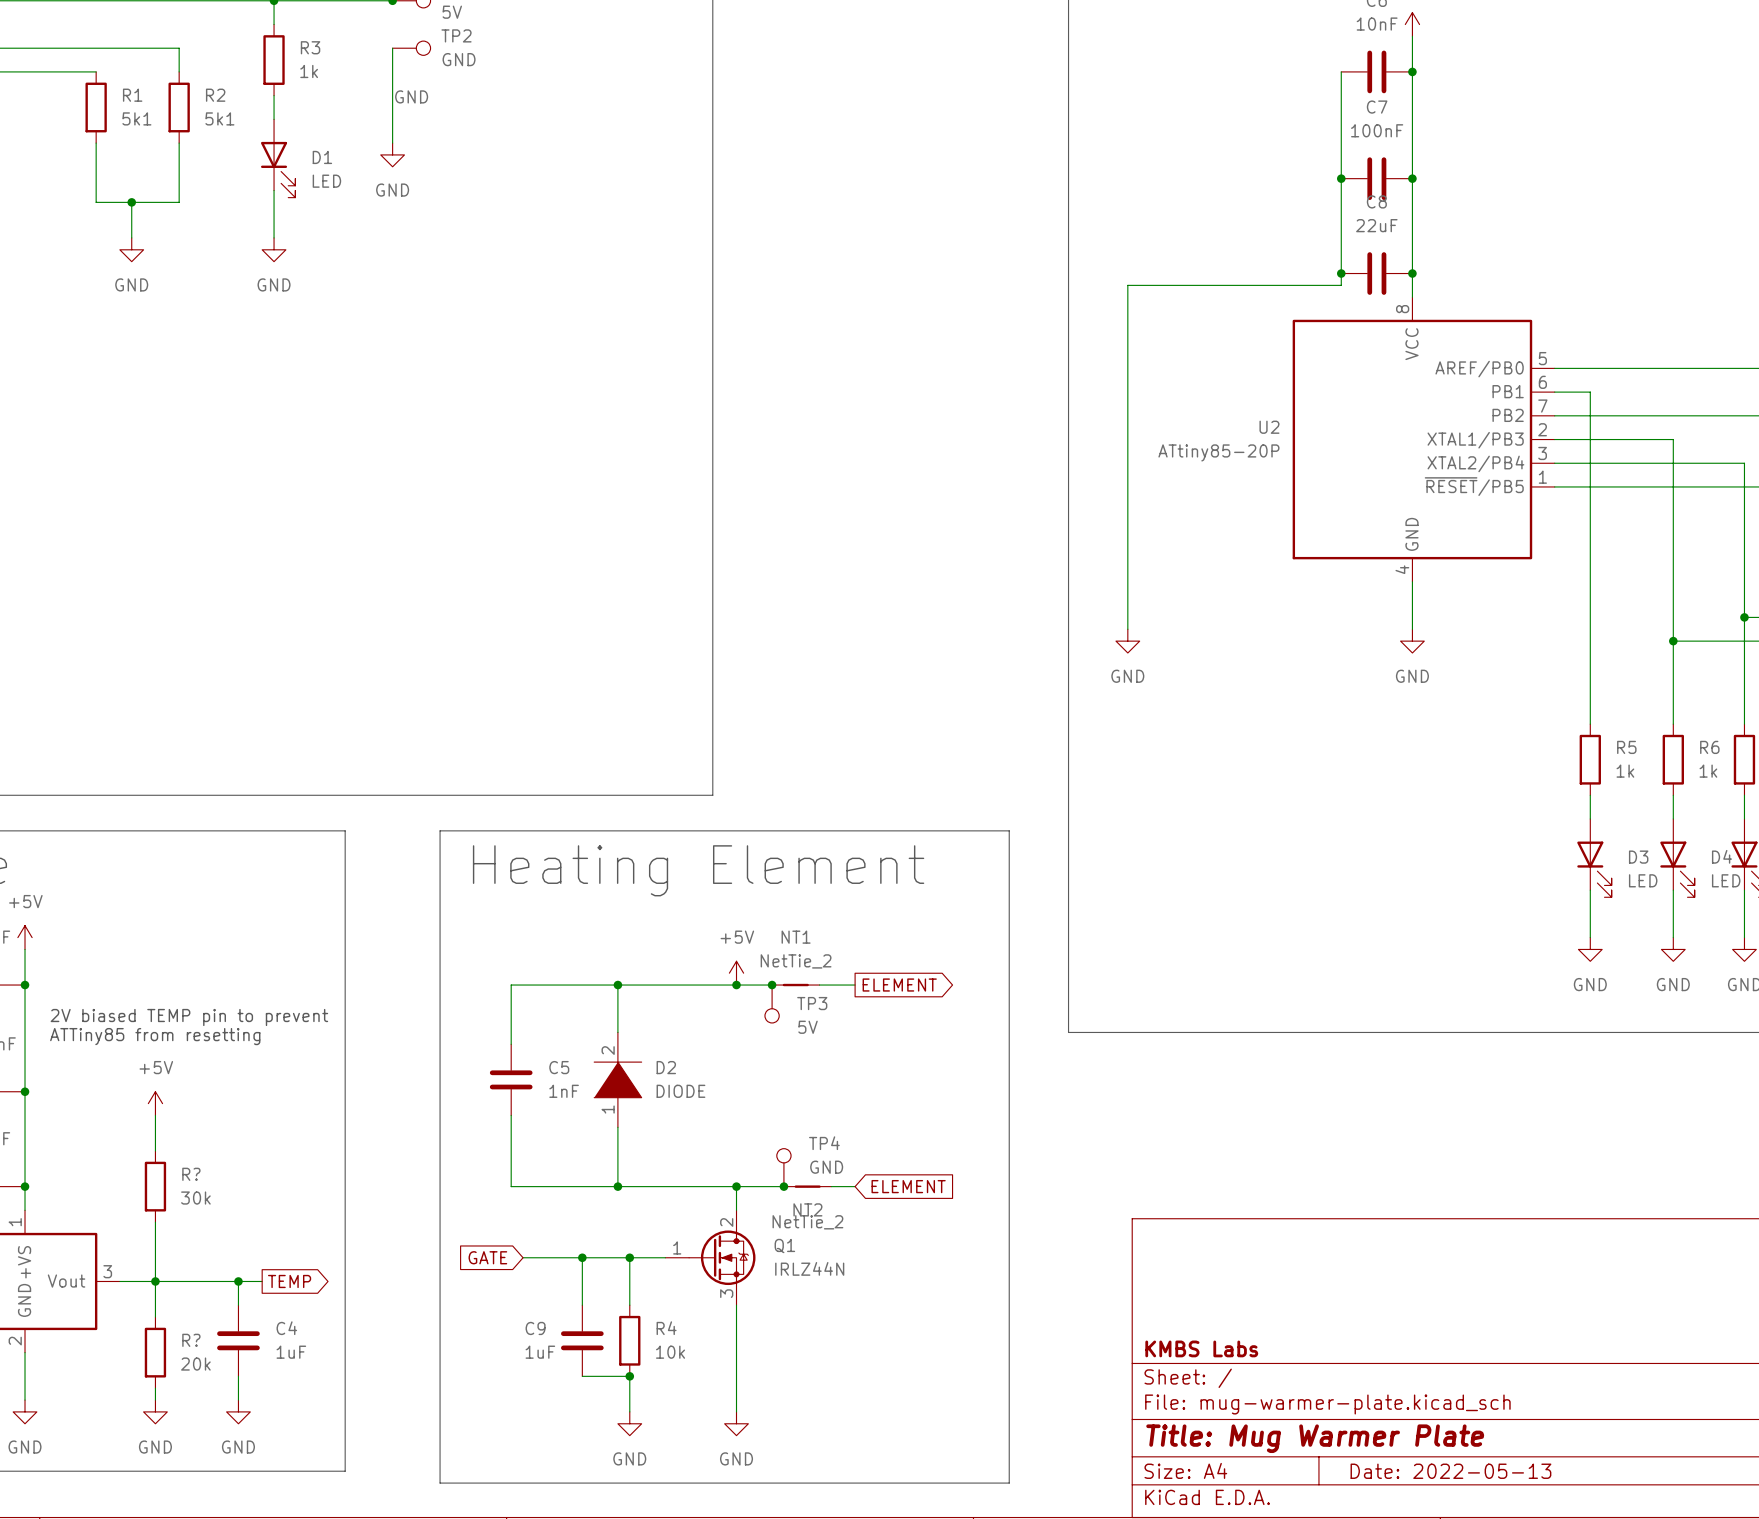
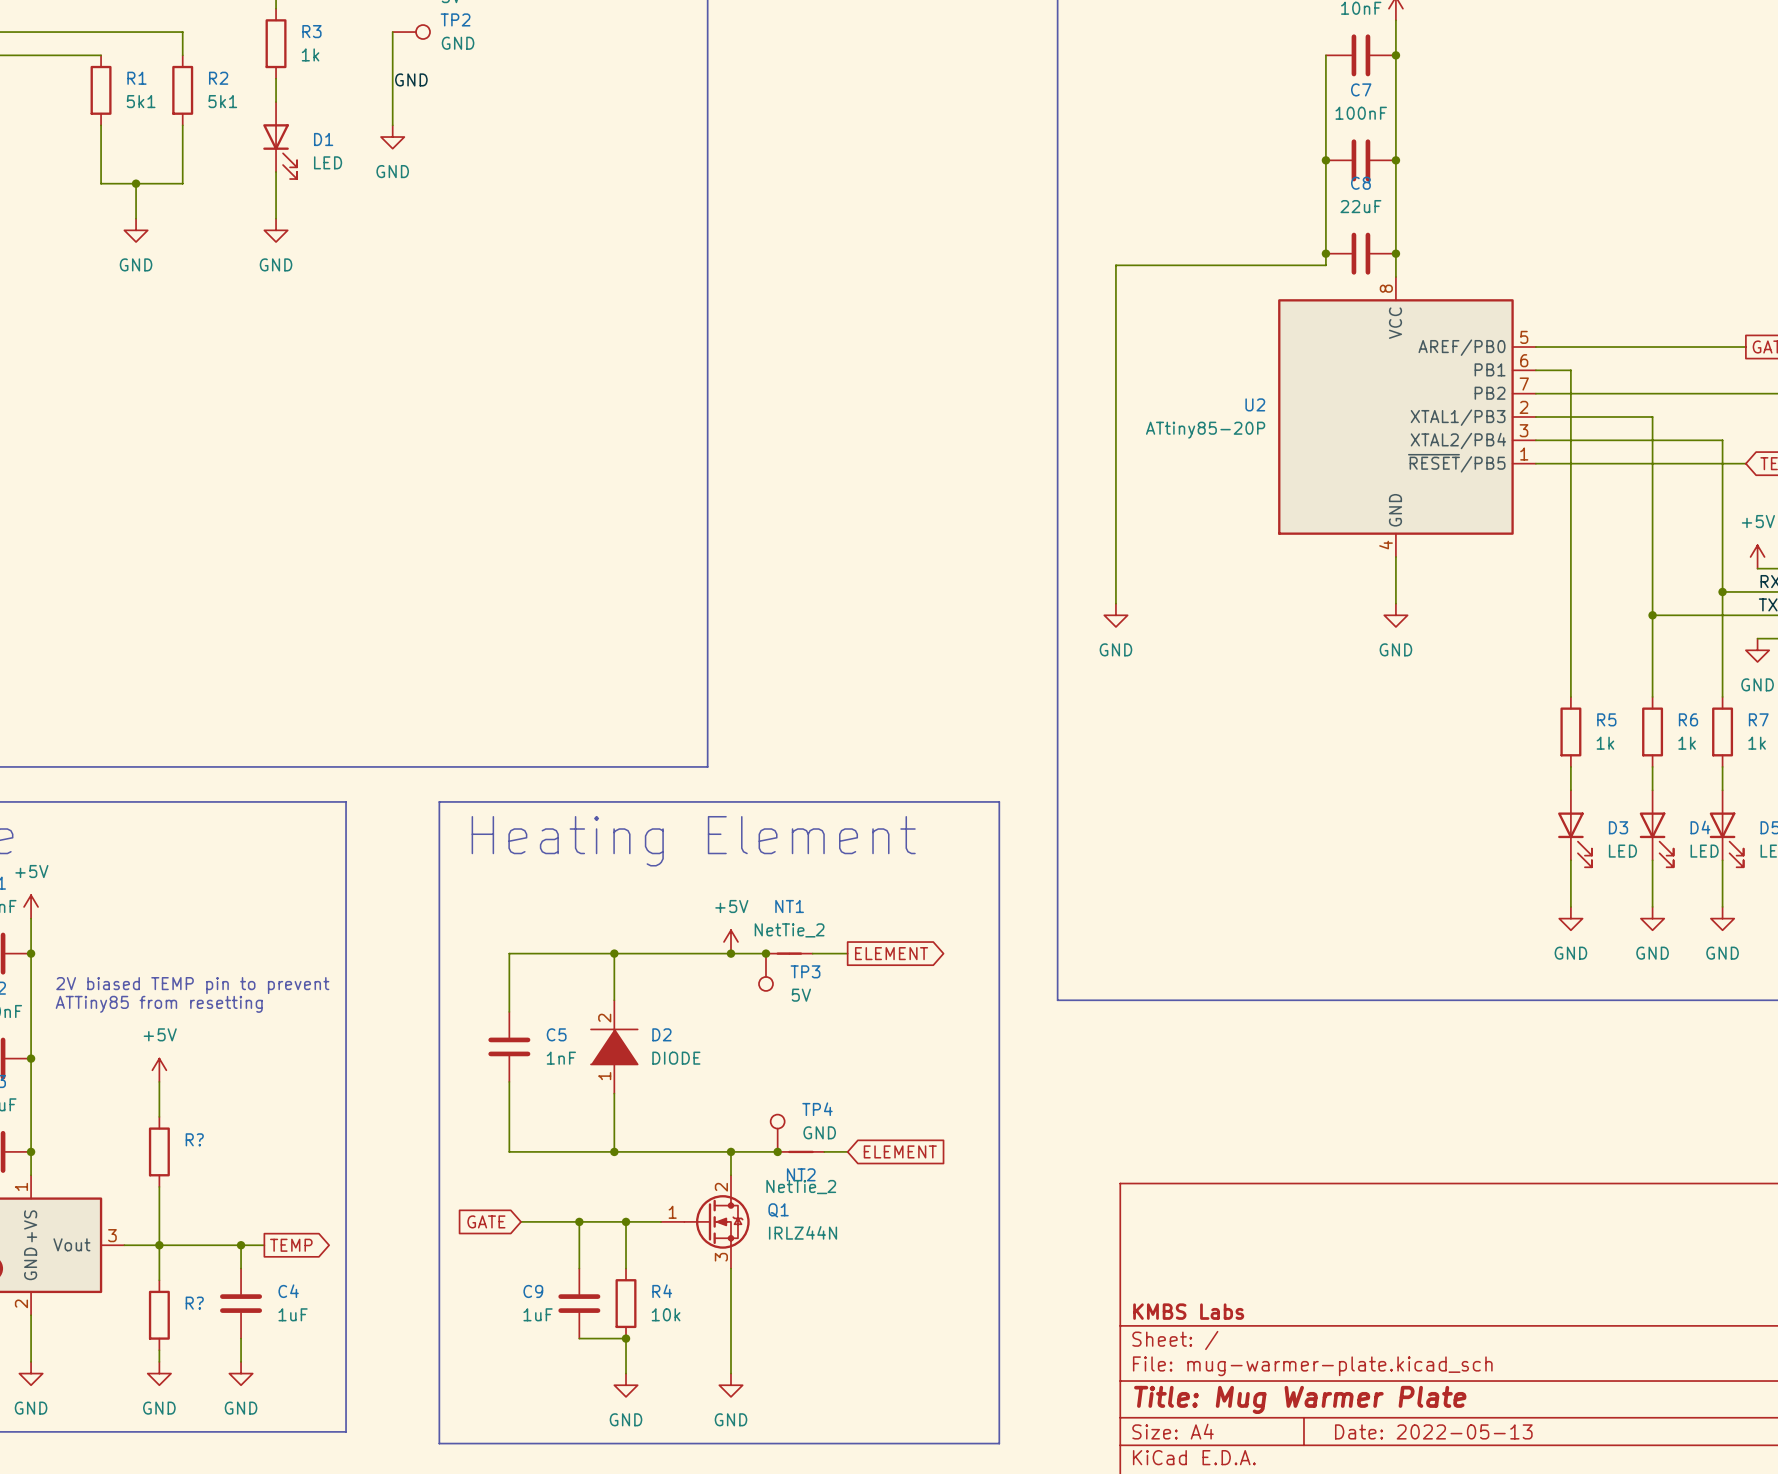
R? value: 30k (195, 1198) -> none
R? value: 20k (195, 1364) -> none

